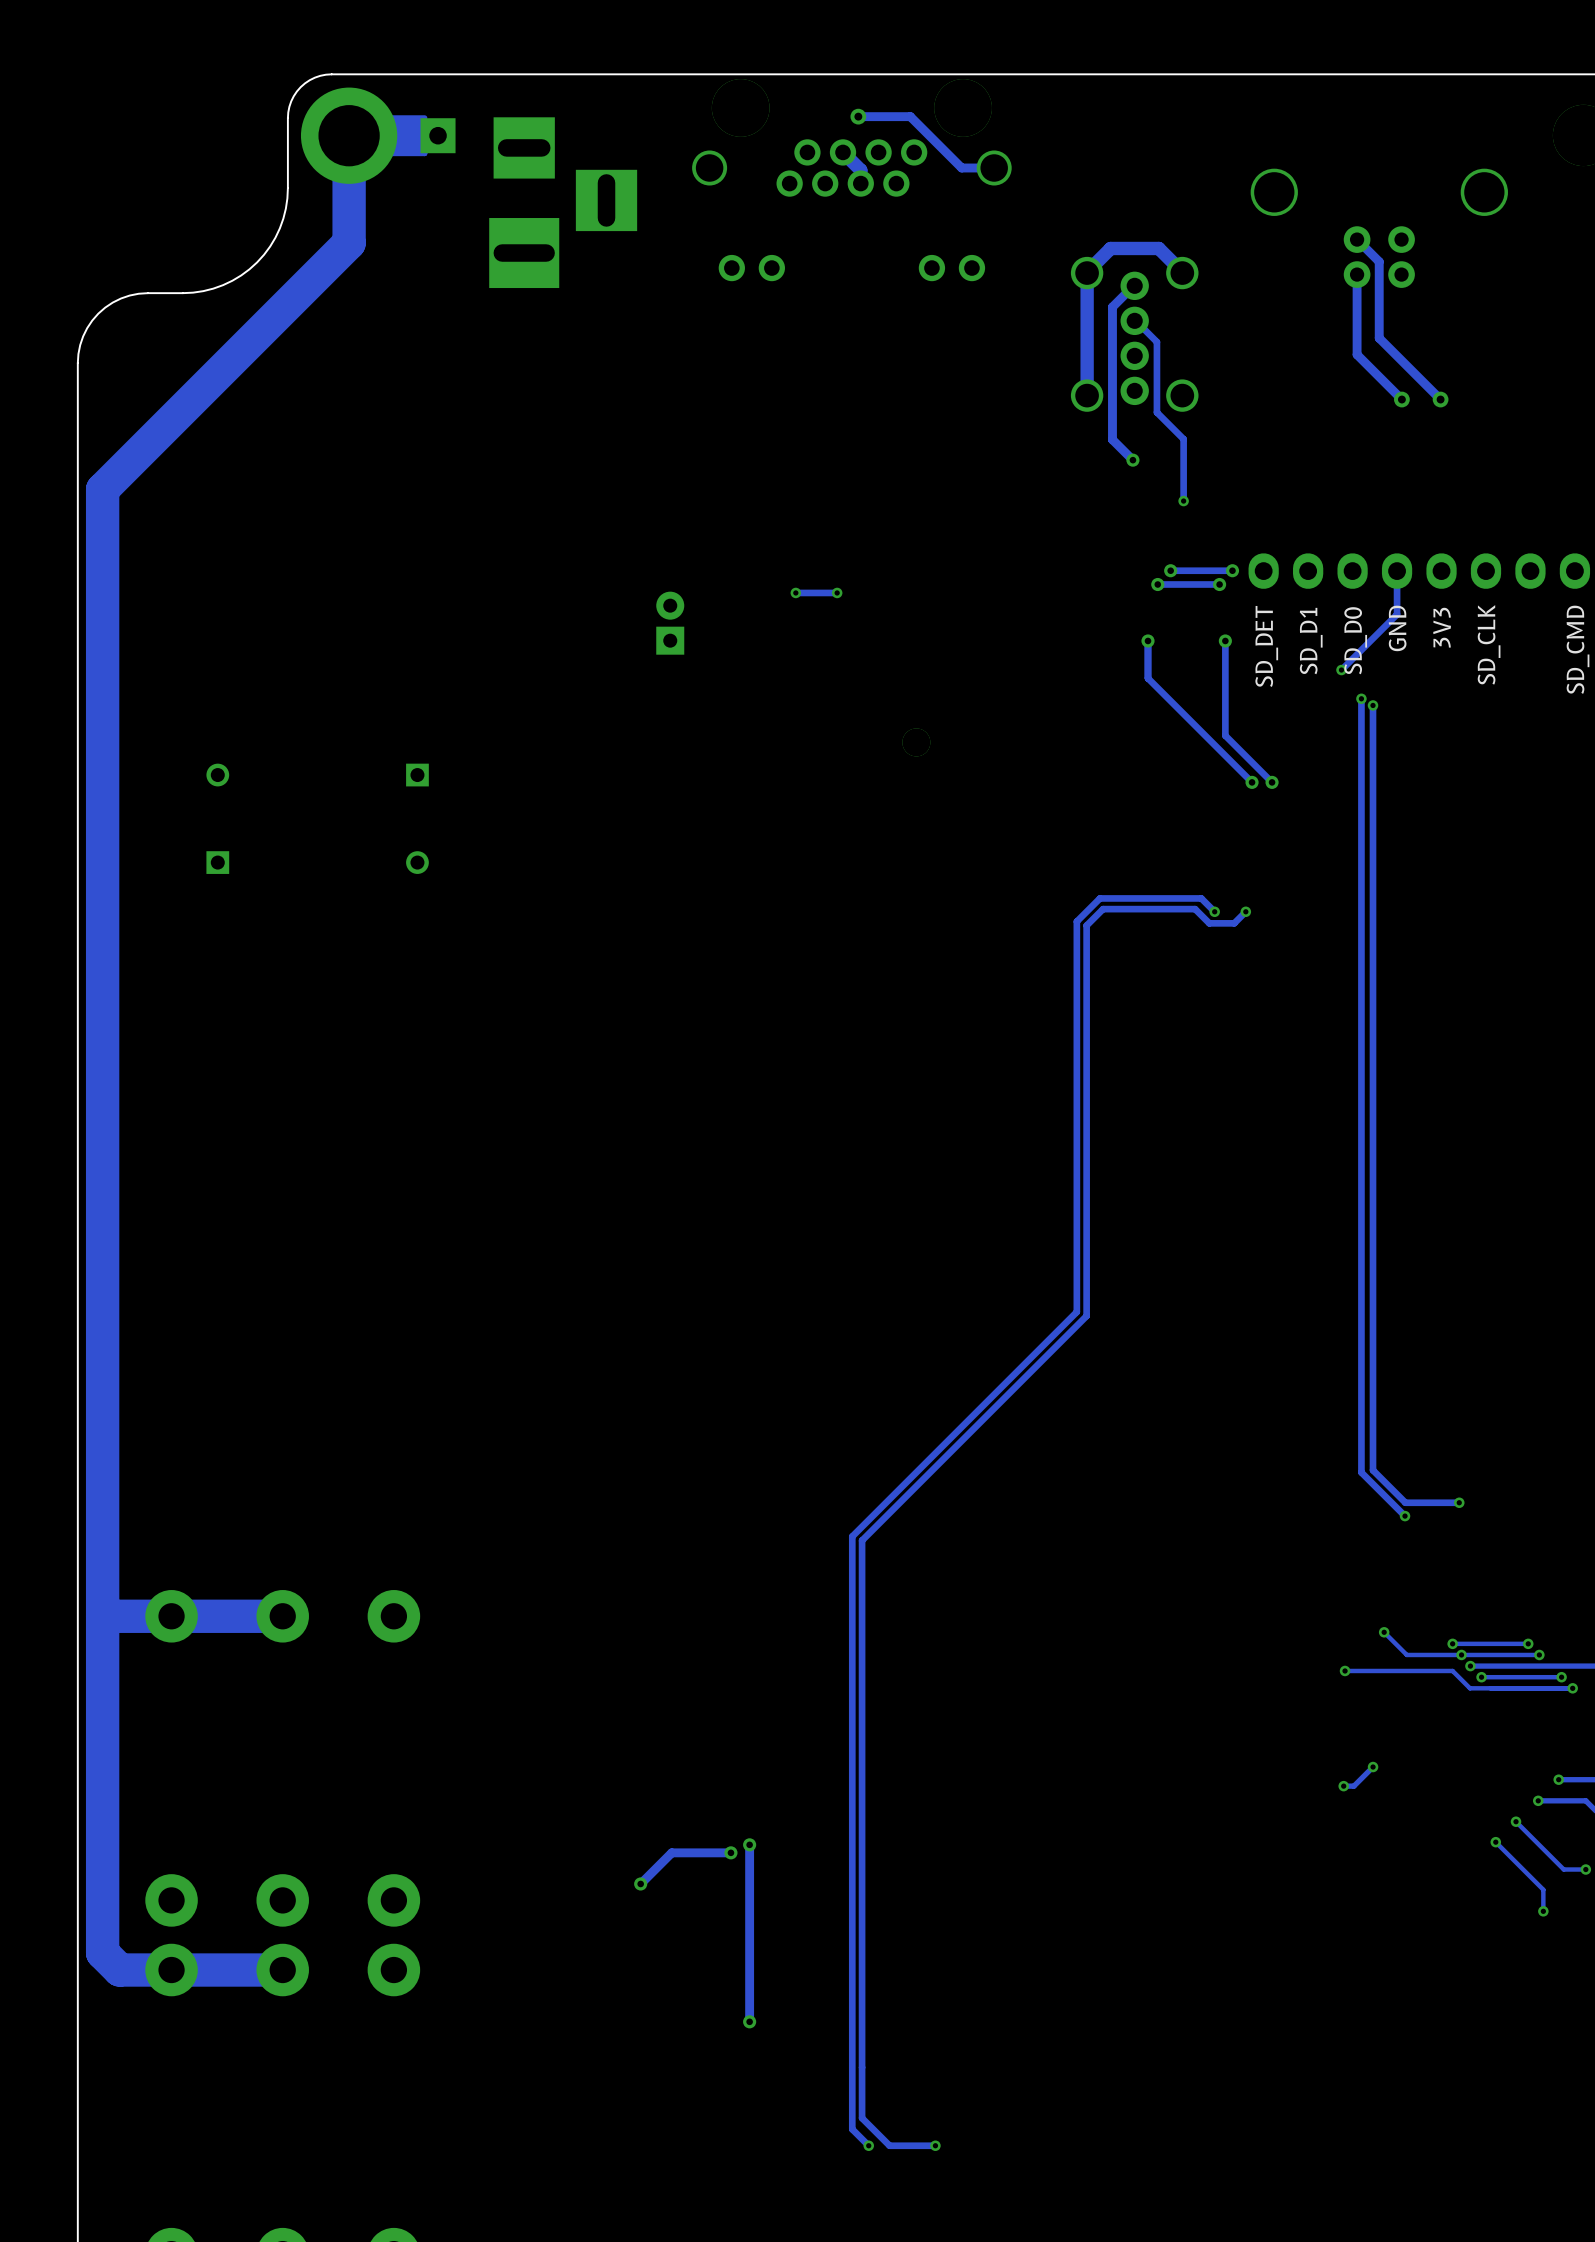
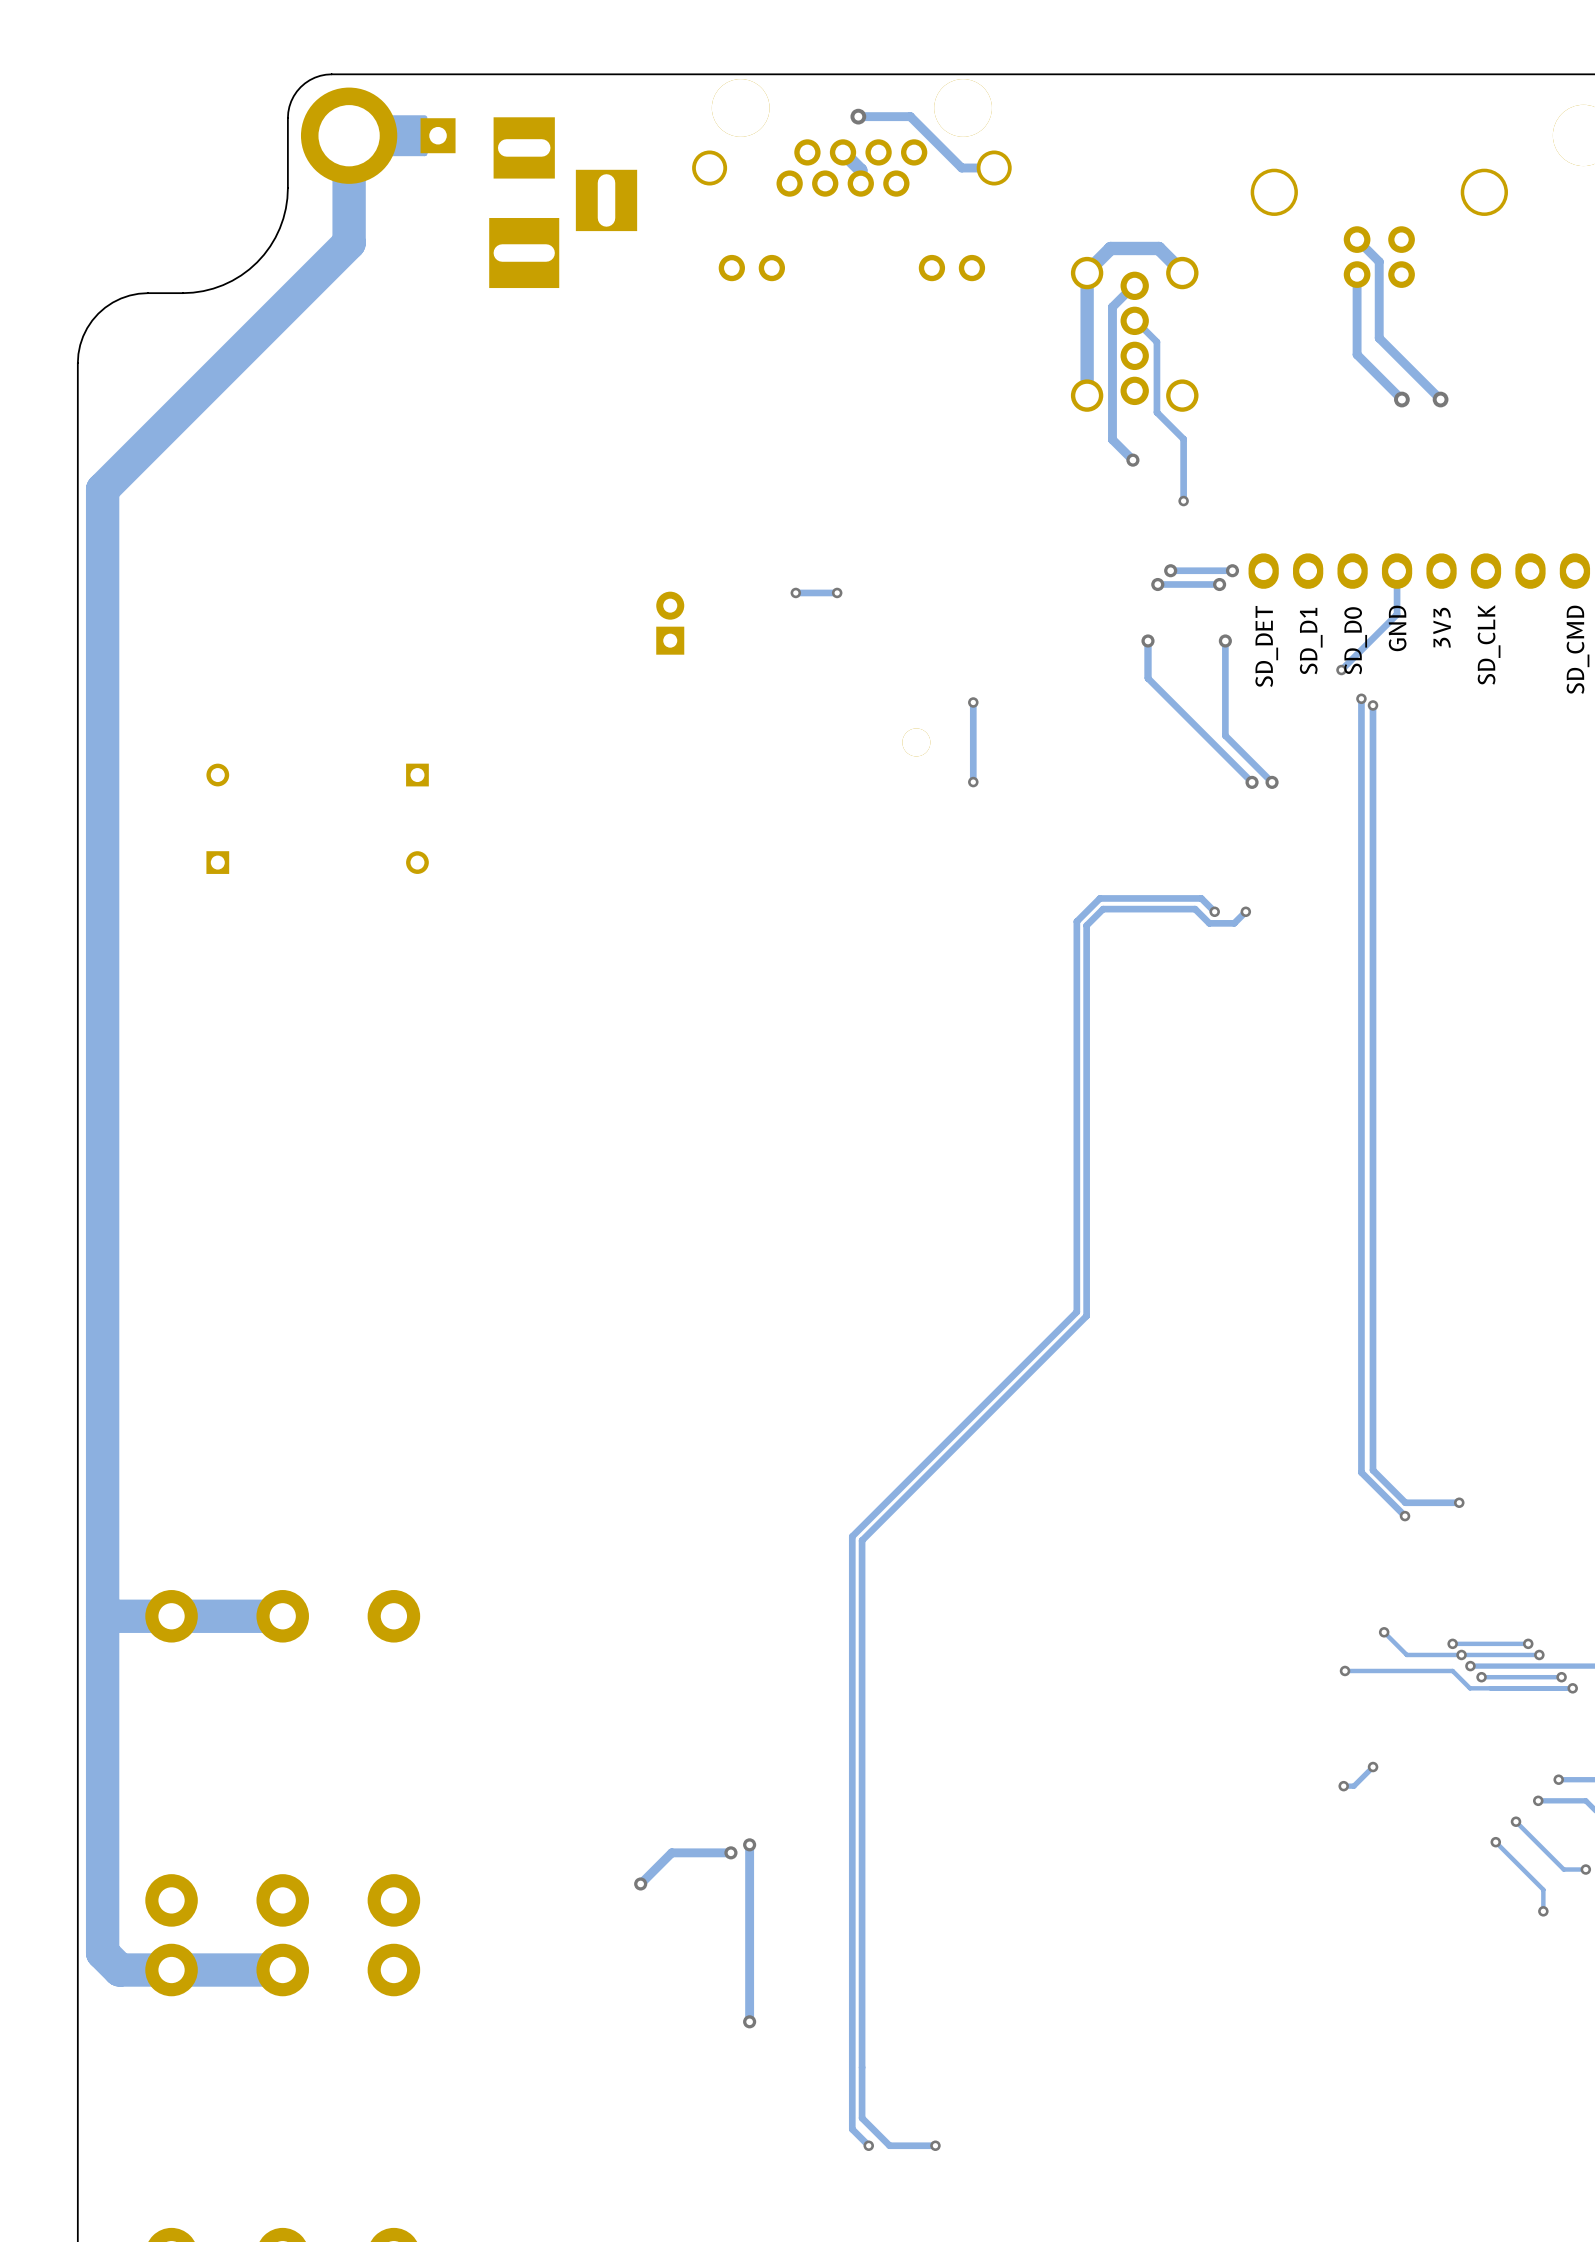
track: none -> (973, 702) (973, 782)
via: none -> (973, 702)
via: none -> (973, 782)

